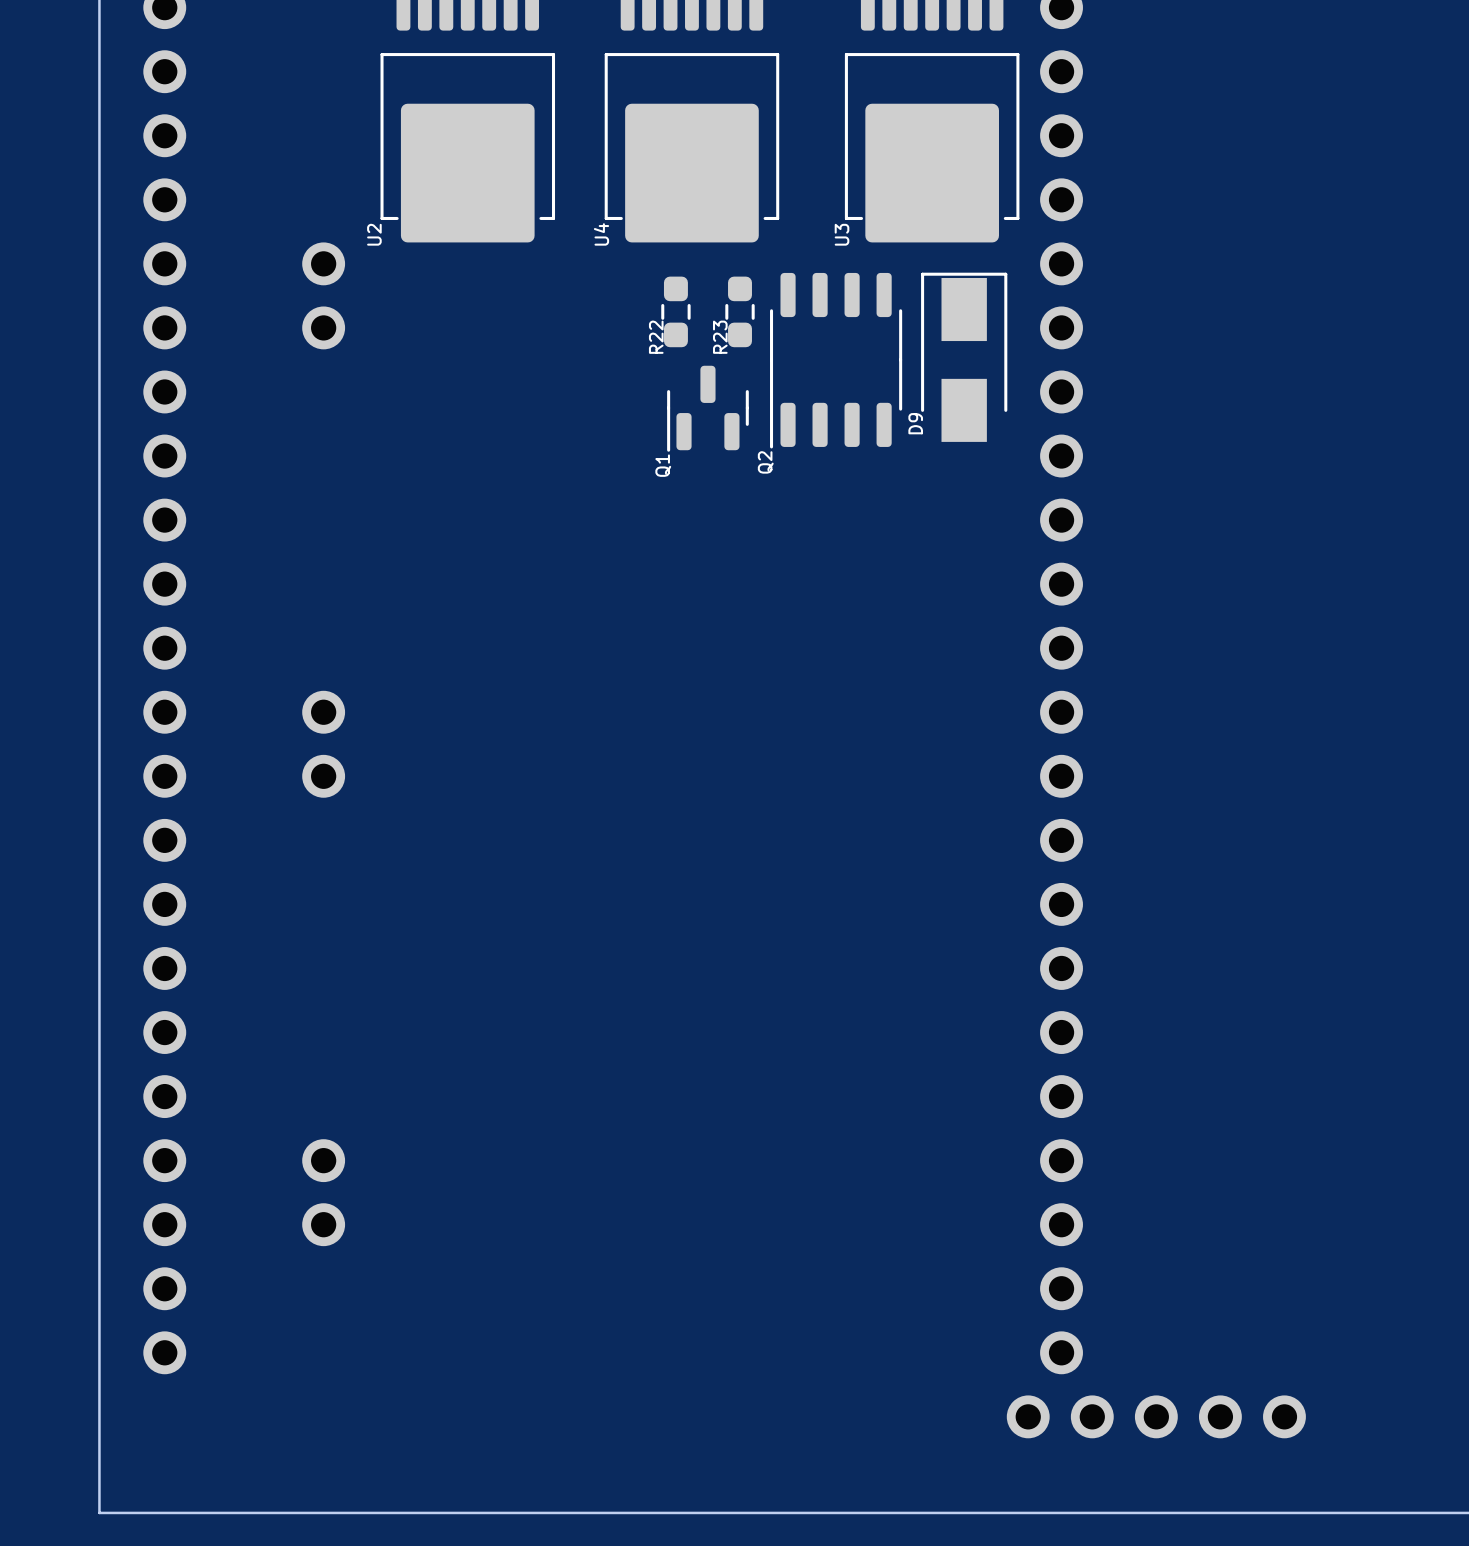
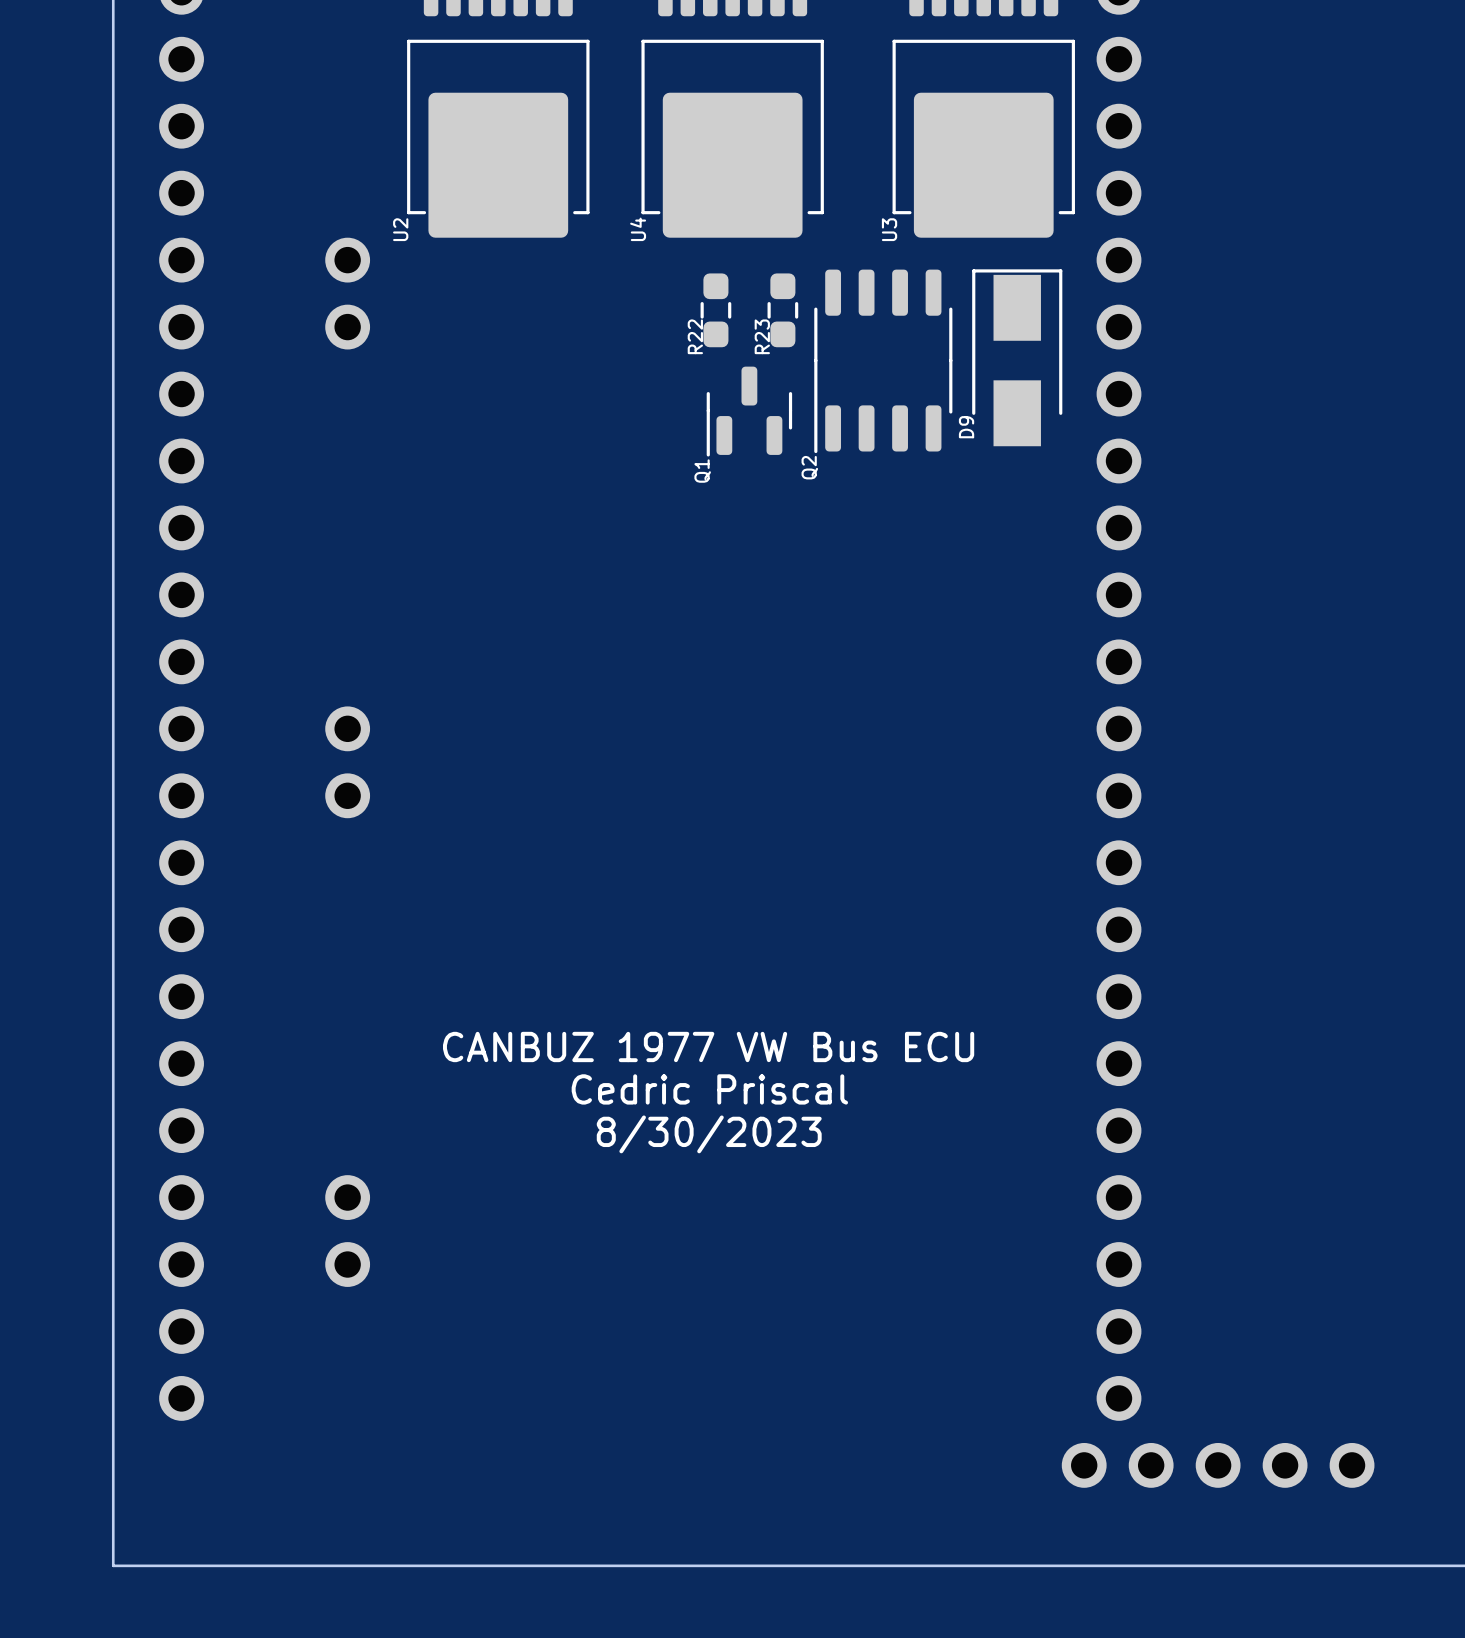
text: none -> CANBUZ 1977 VW Bus ECU (708, 1046)
text: none -> Cedric Priscal (709, 1089)
text: none -> 8/30/2023 (709, 1134)

